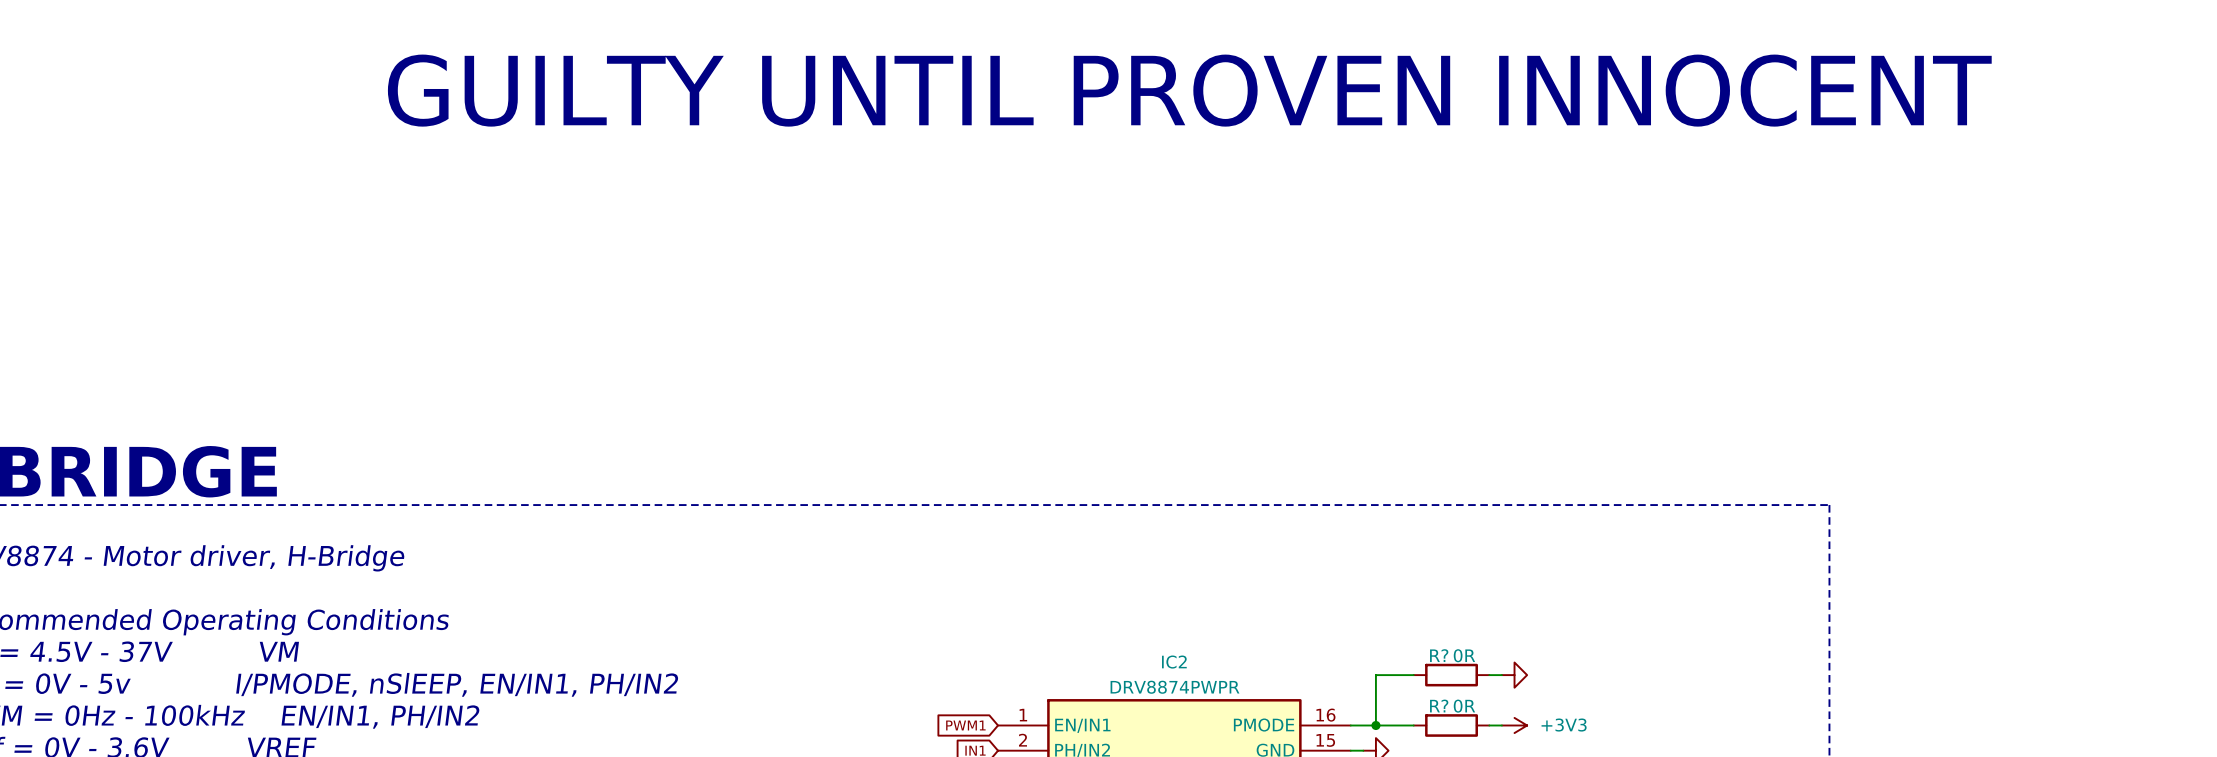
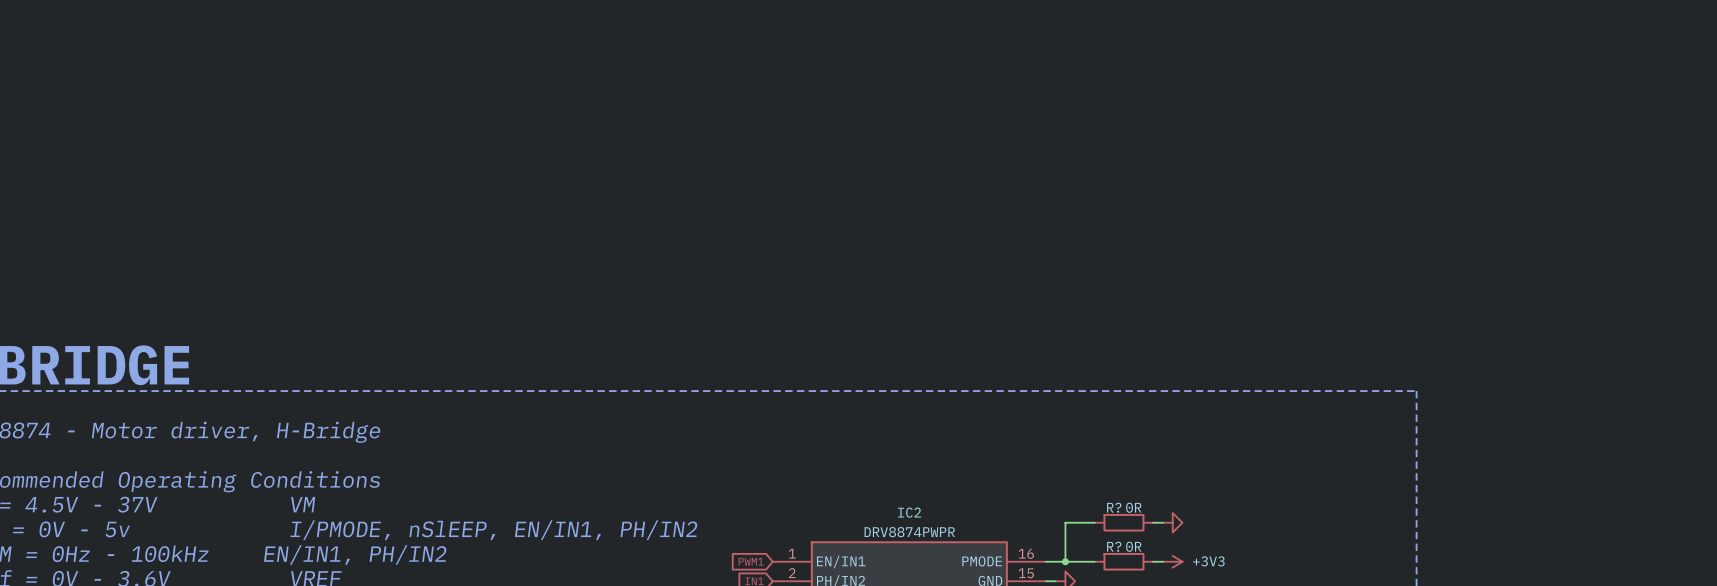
text: GUILTY UNTIL PROVEN INNOCENT (1189, 90) -> none

